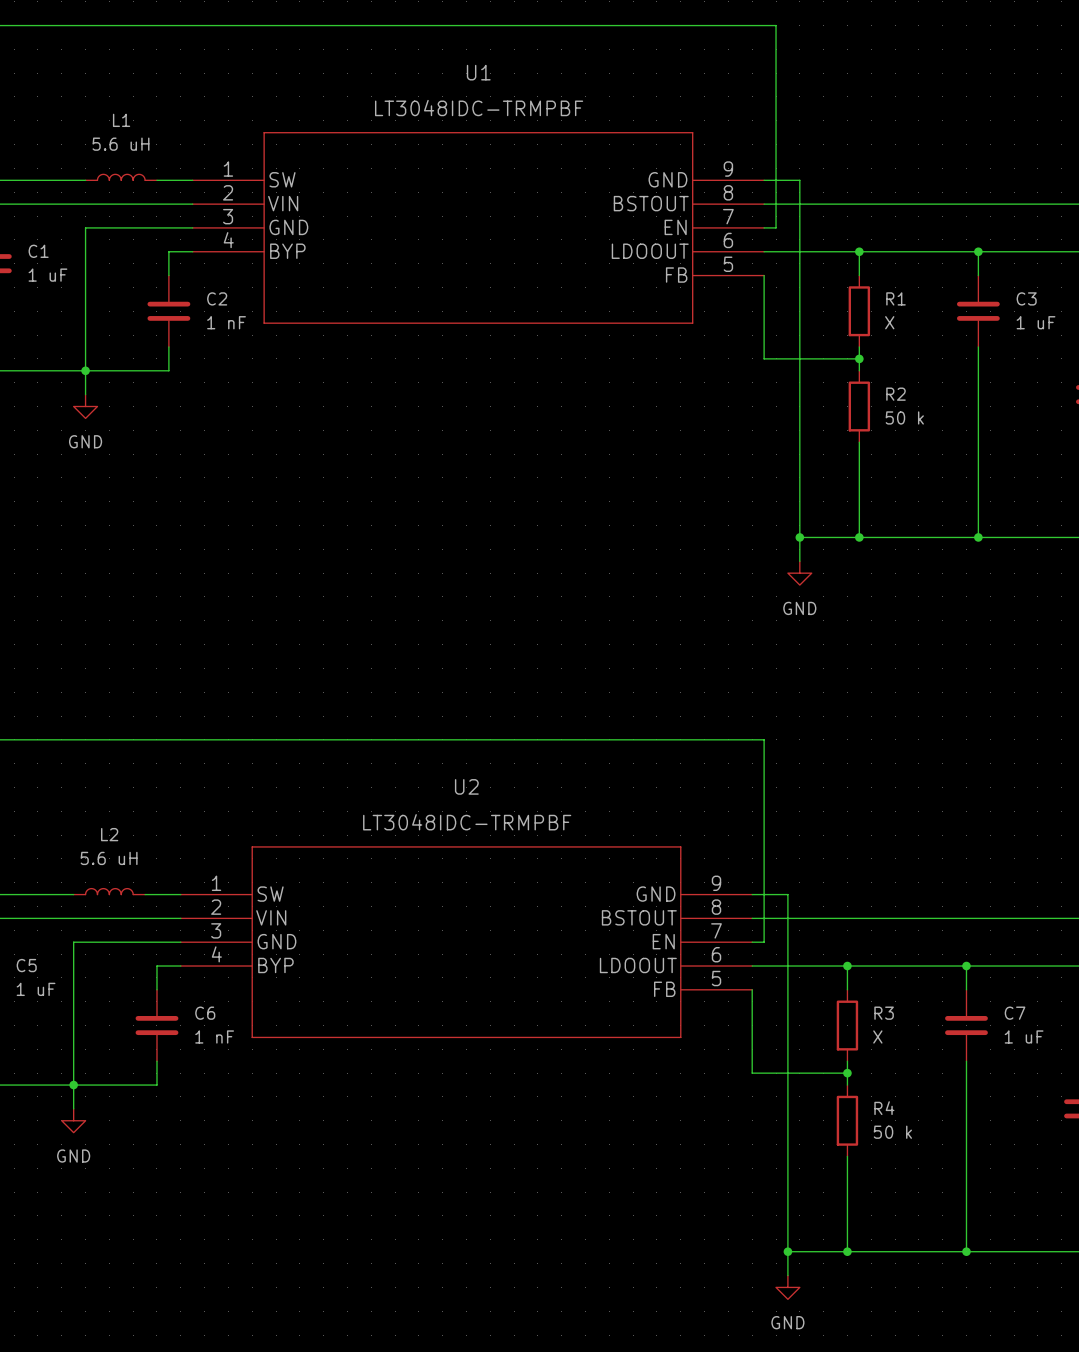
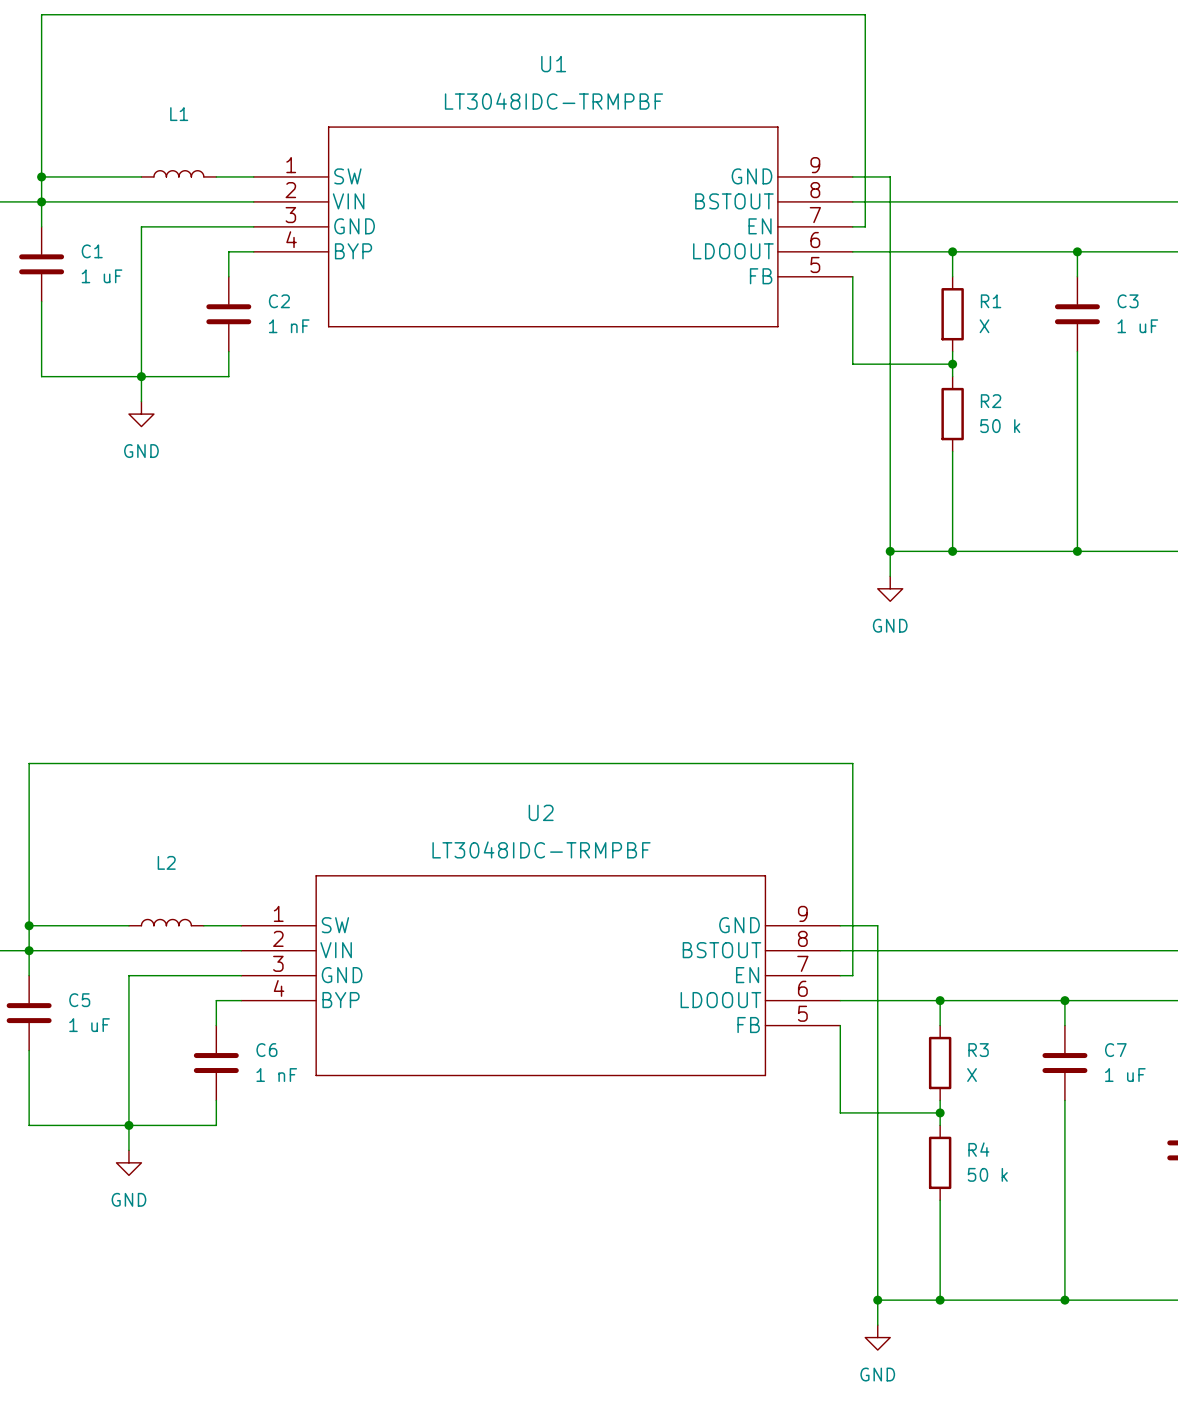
L1 value: 5.6 uH (120, 144) -> none
L2 value: 5.6 uH (109, 858) -> none

